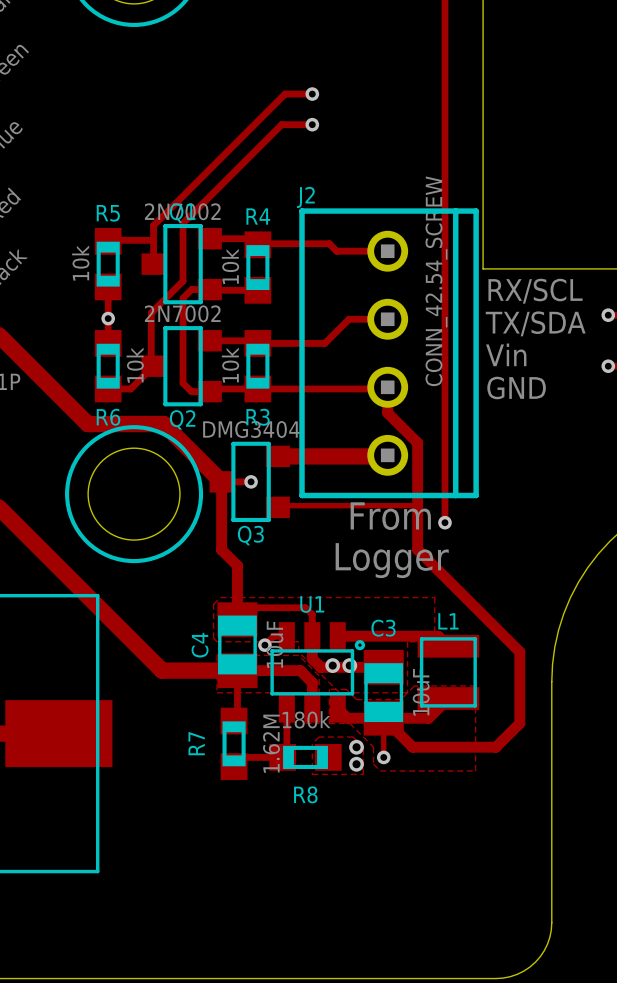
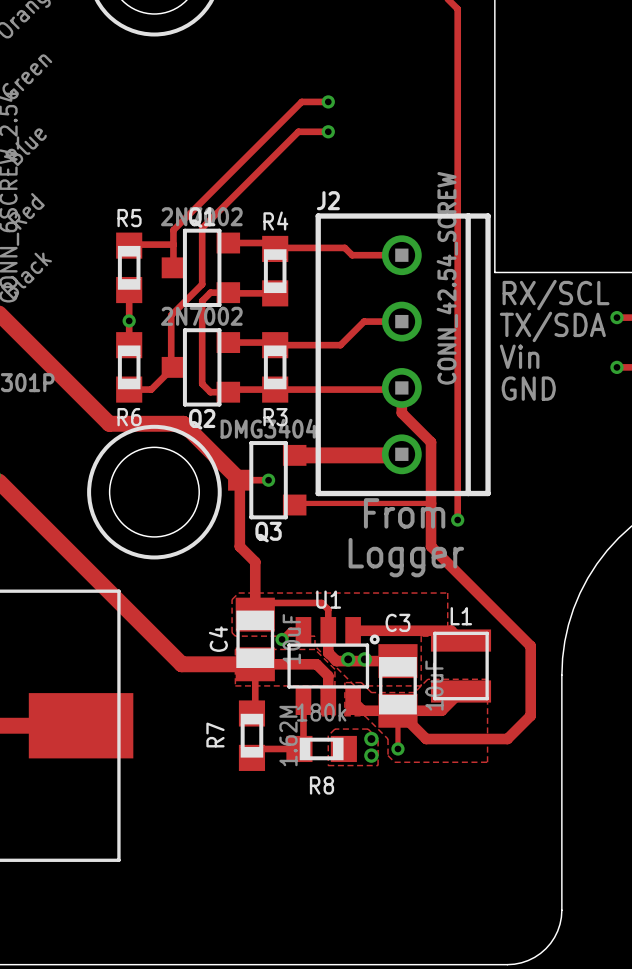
R5 value: 10k (80, 263) -> none
R4 value: 10k (230, 266) -> none
R6 value: 10k (135, 365) -> none
R3 value: 10k (230, 365) -> none

